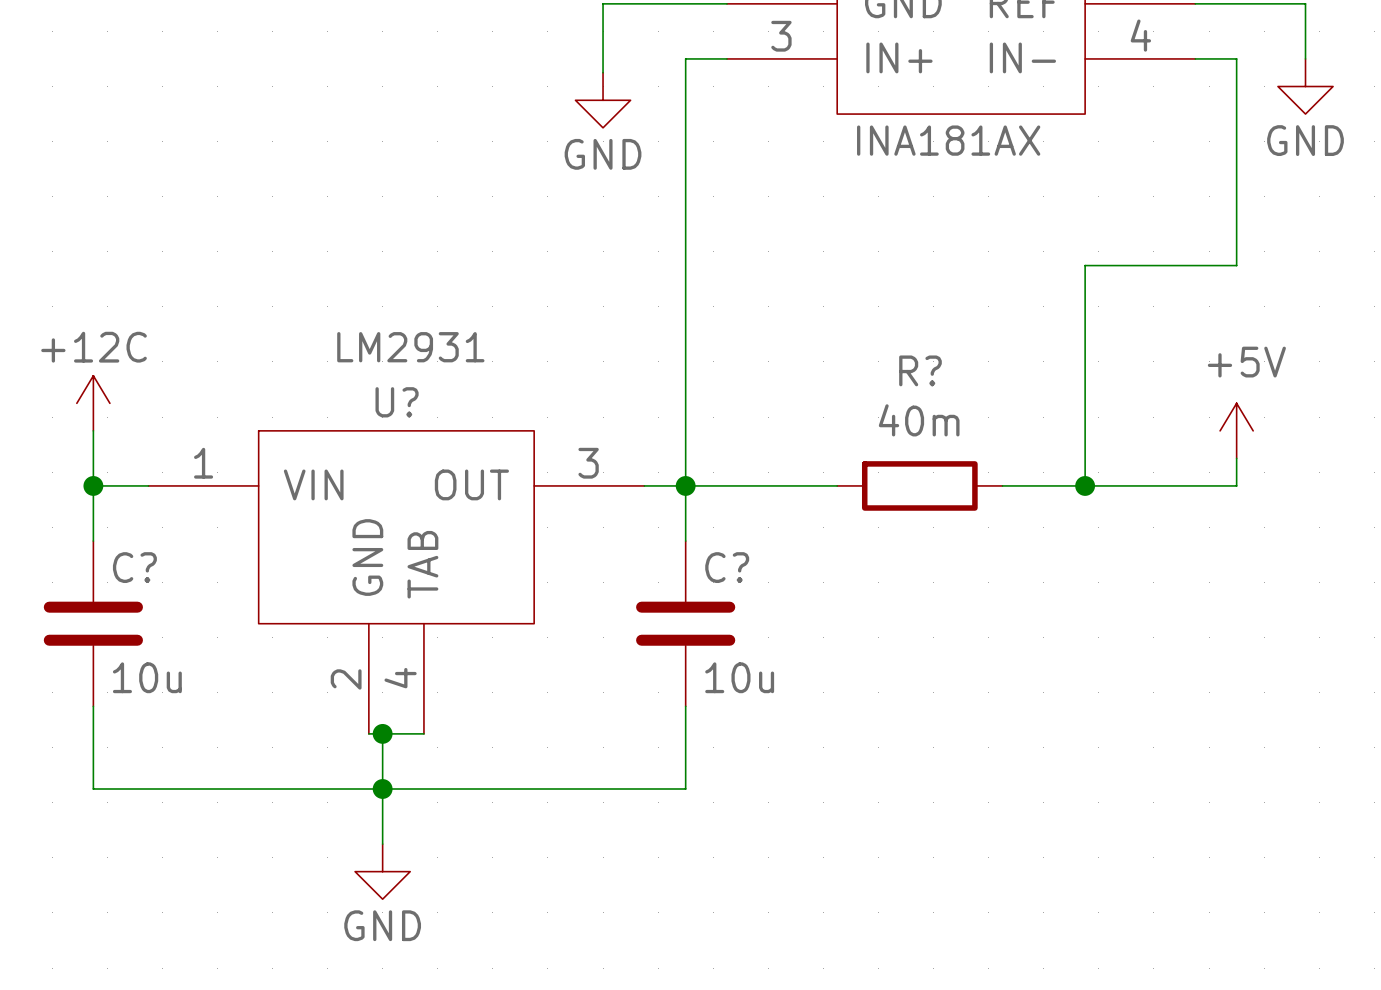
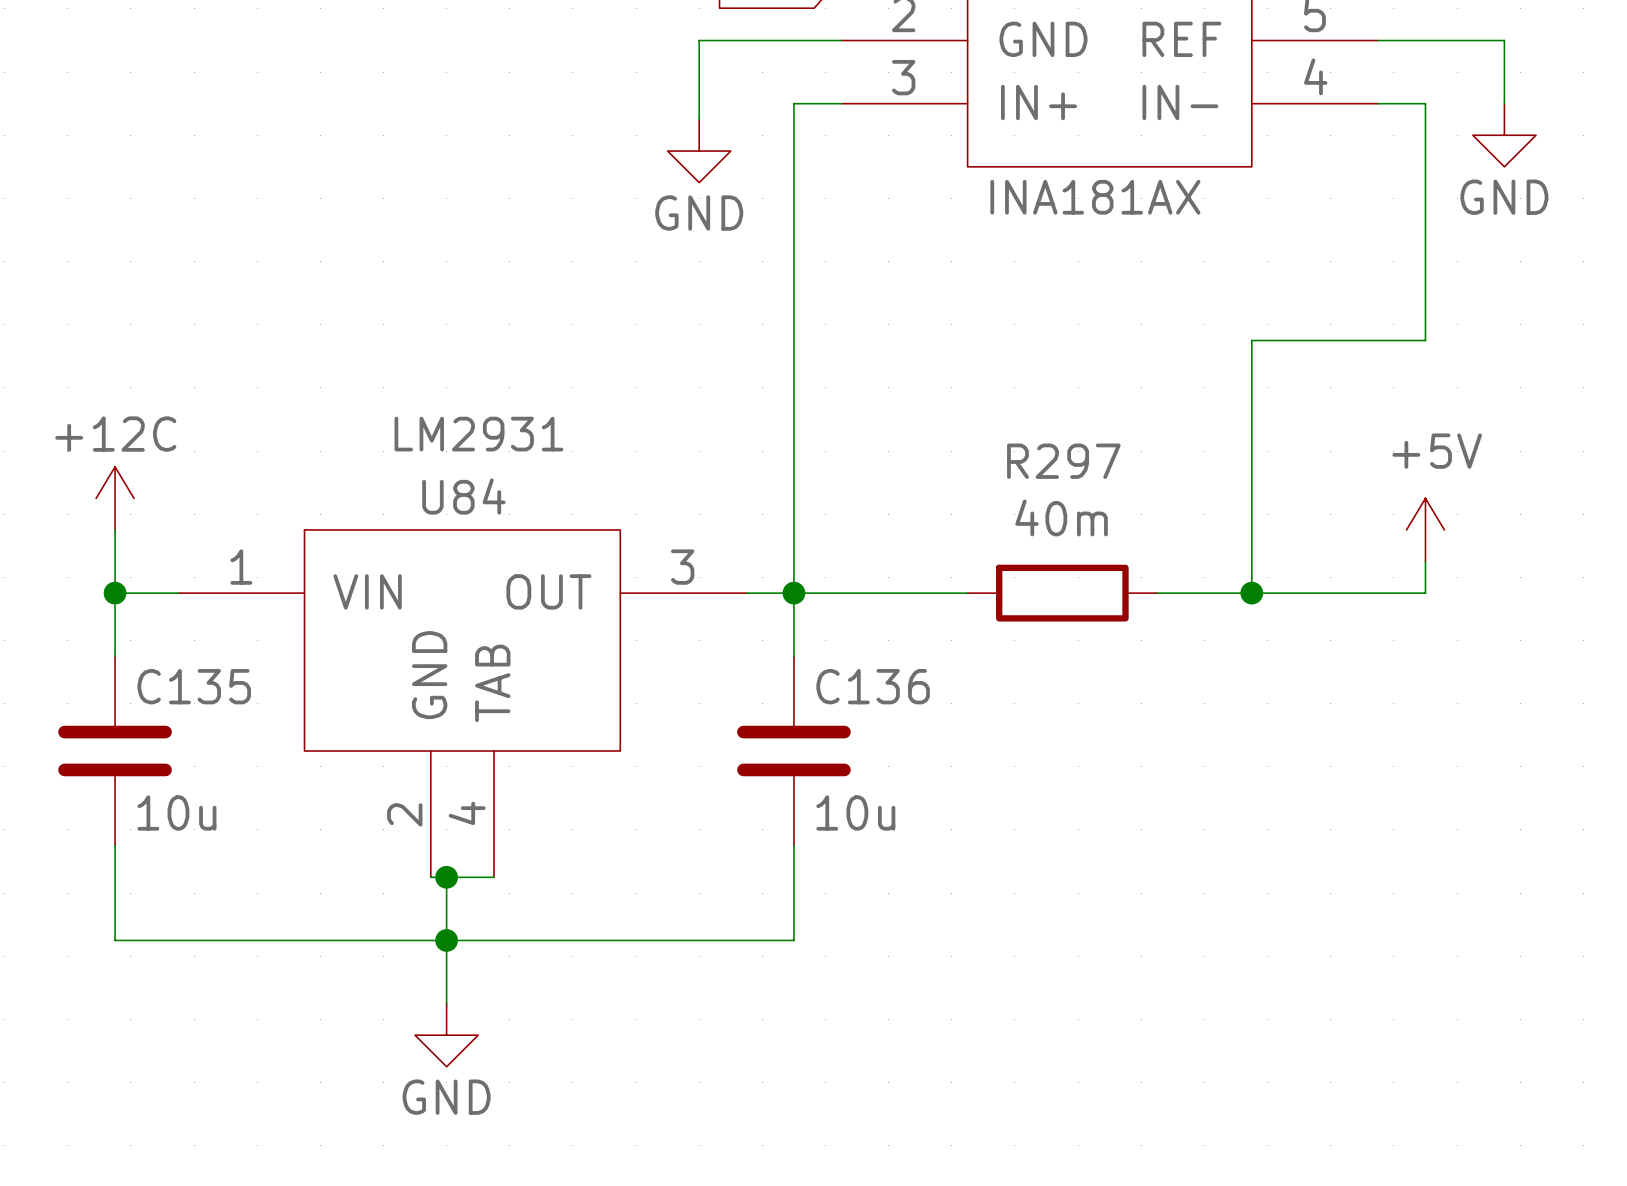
R? name: R? (920, 370) -> R297 (1063, 461)
U? name: U? (397, 402) -> U84 (463, 496)
C? name: C? (134, 567) -> C135 (194, 686)
C? name: C? (727, 567) -> C136 (873, 686)

